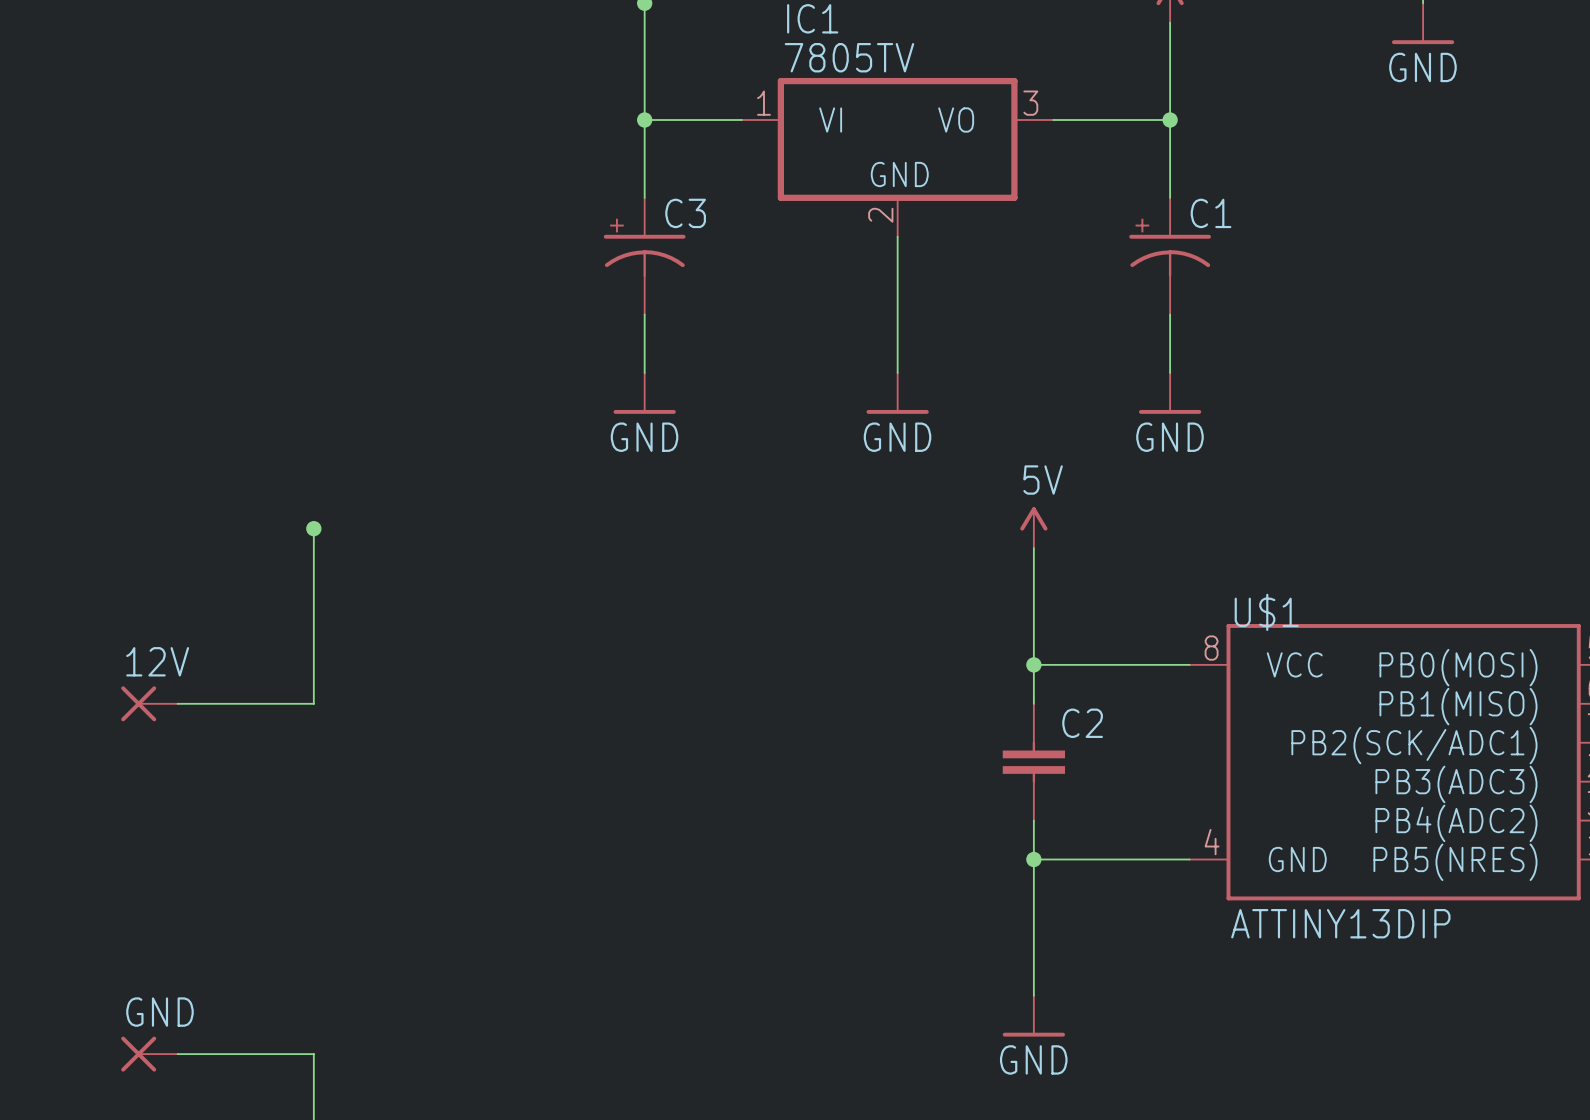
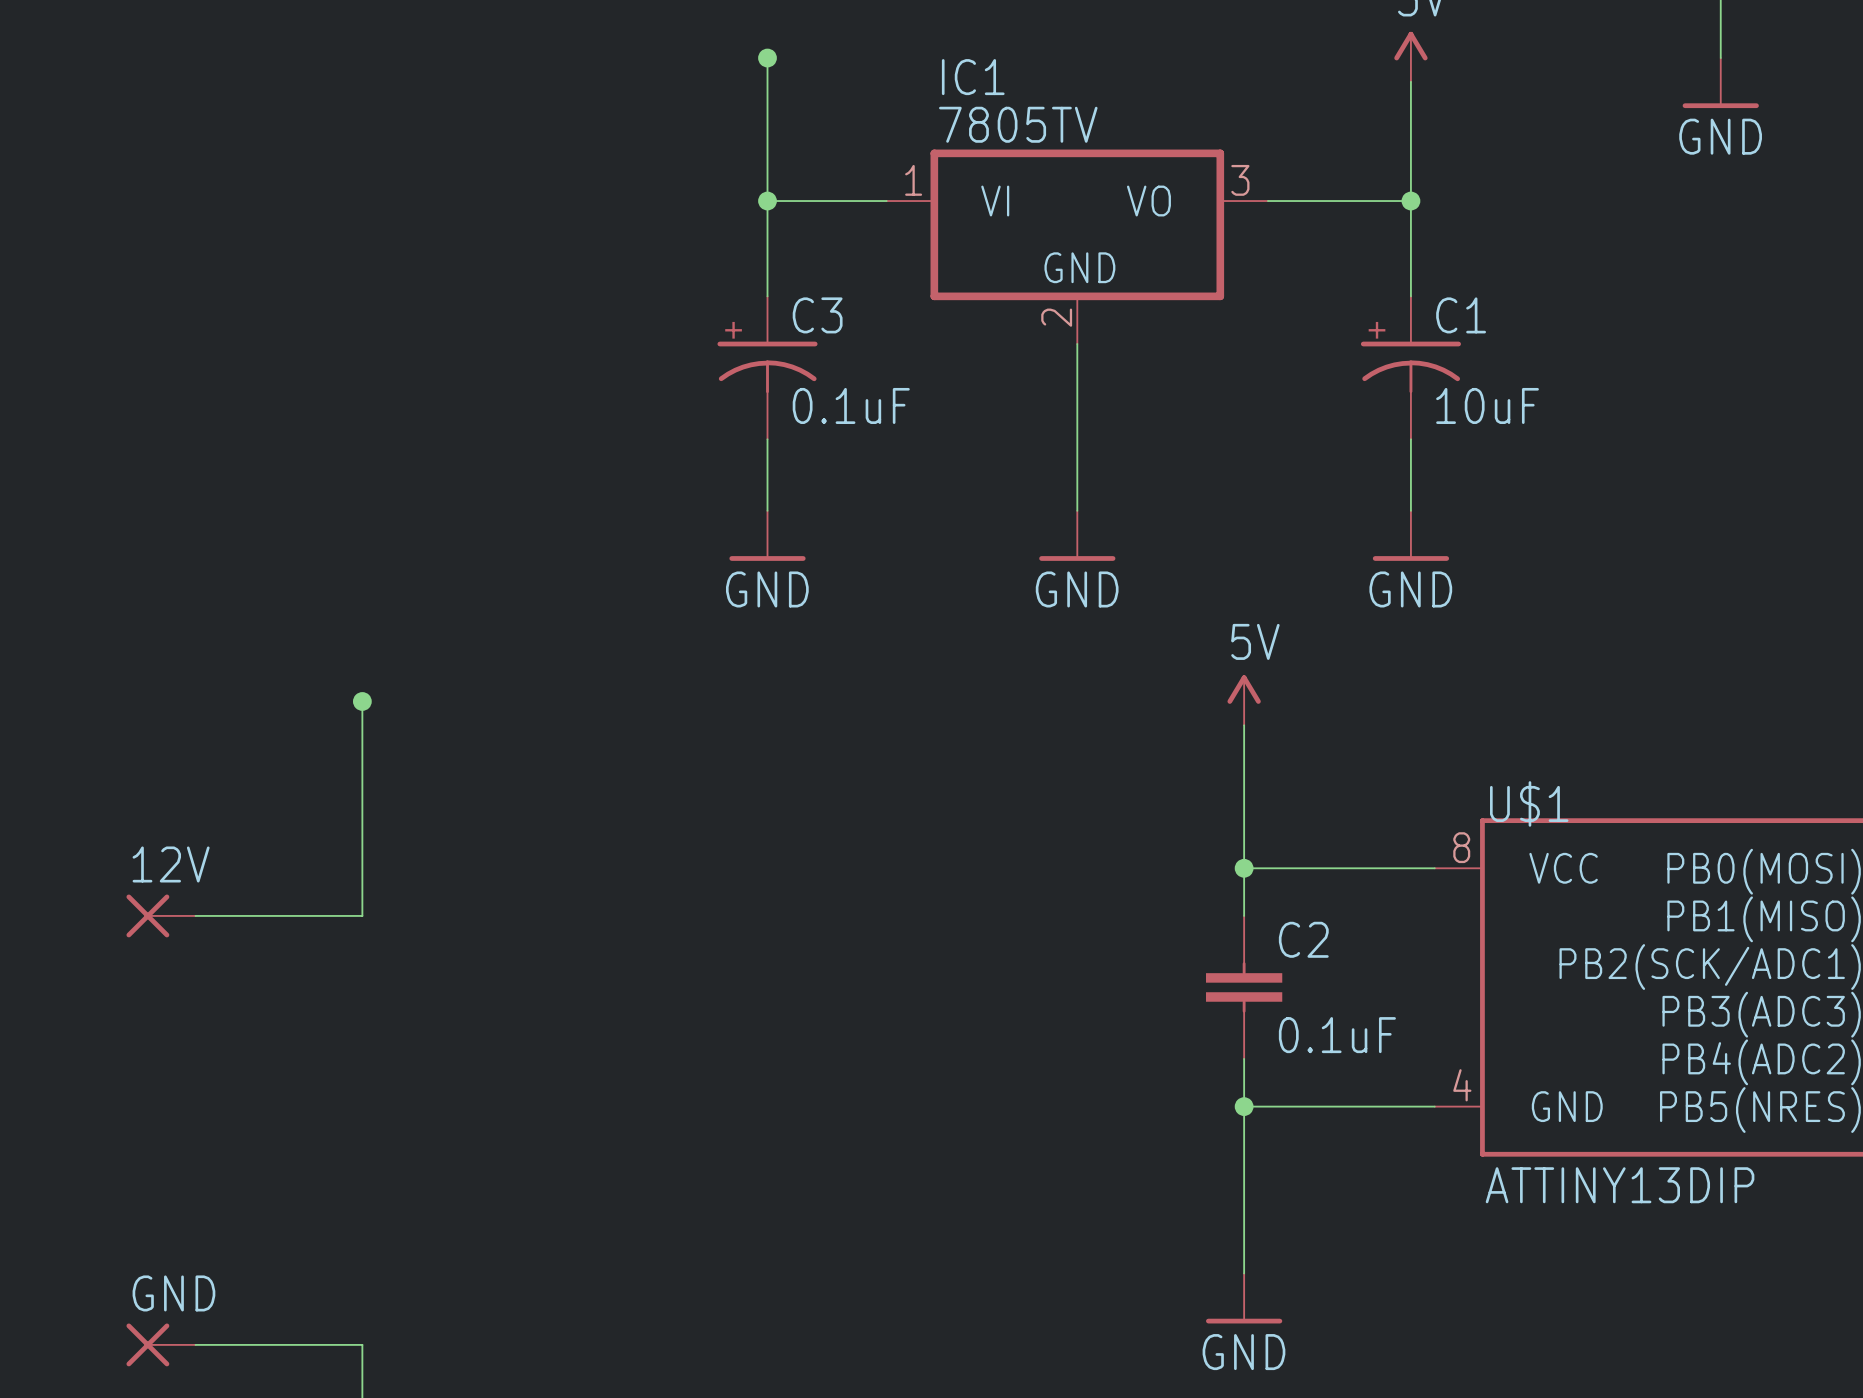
C3 value: none -> 0.1uF (851, 405)
C1 value: none -> 10uF (1487, 405)
C2 value: none -> 0.1uF (1337, 1035)

